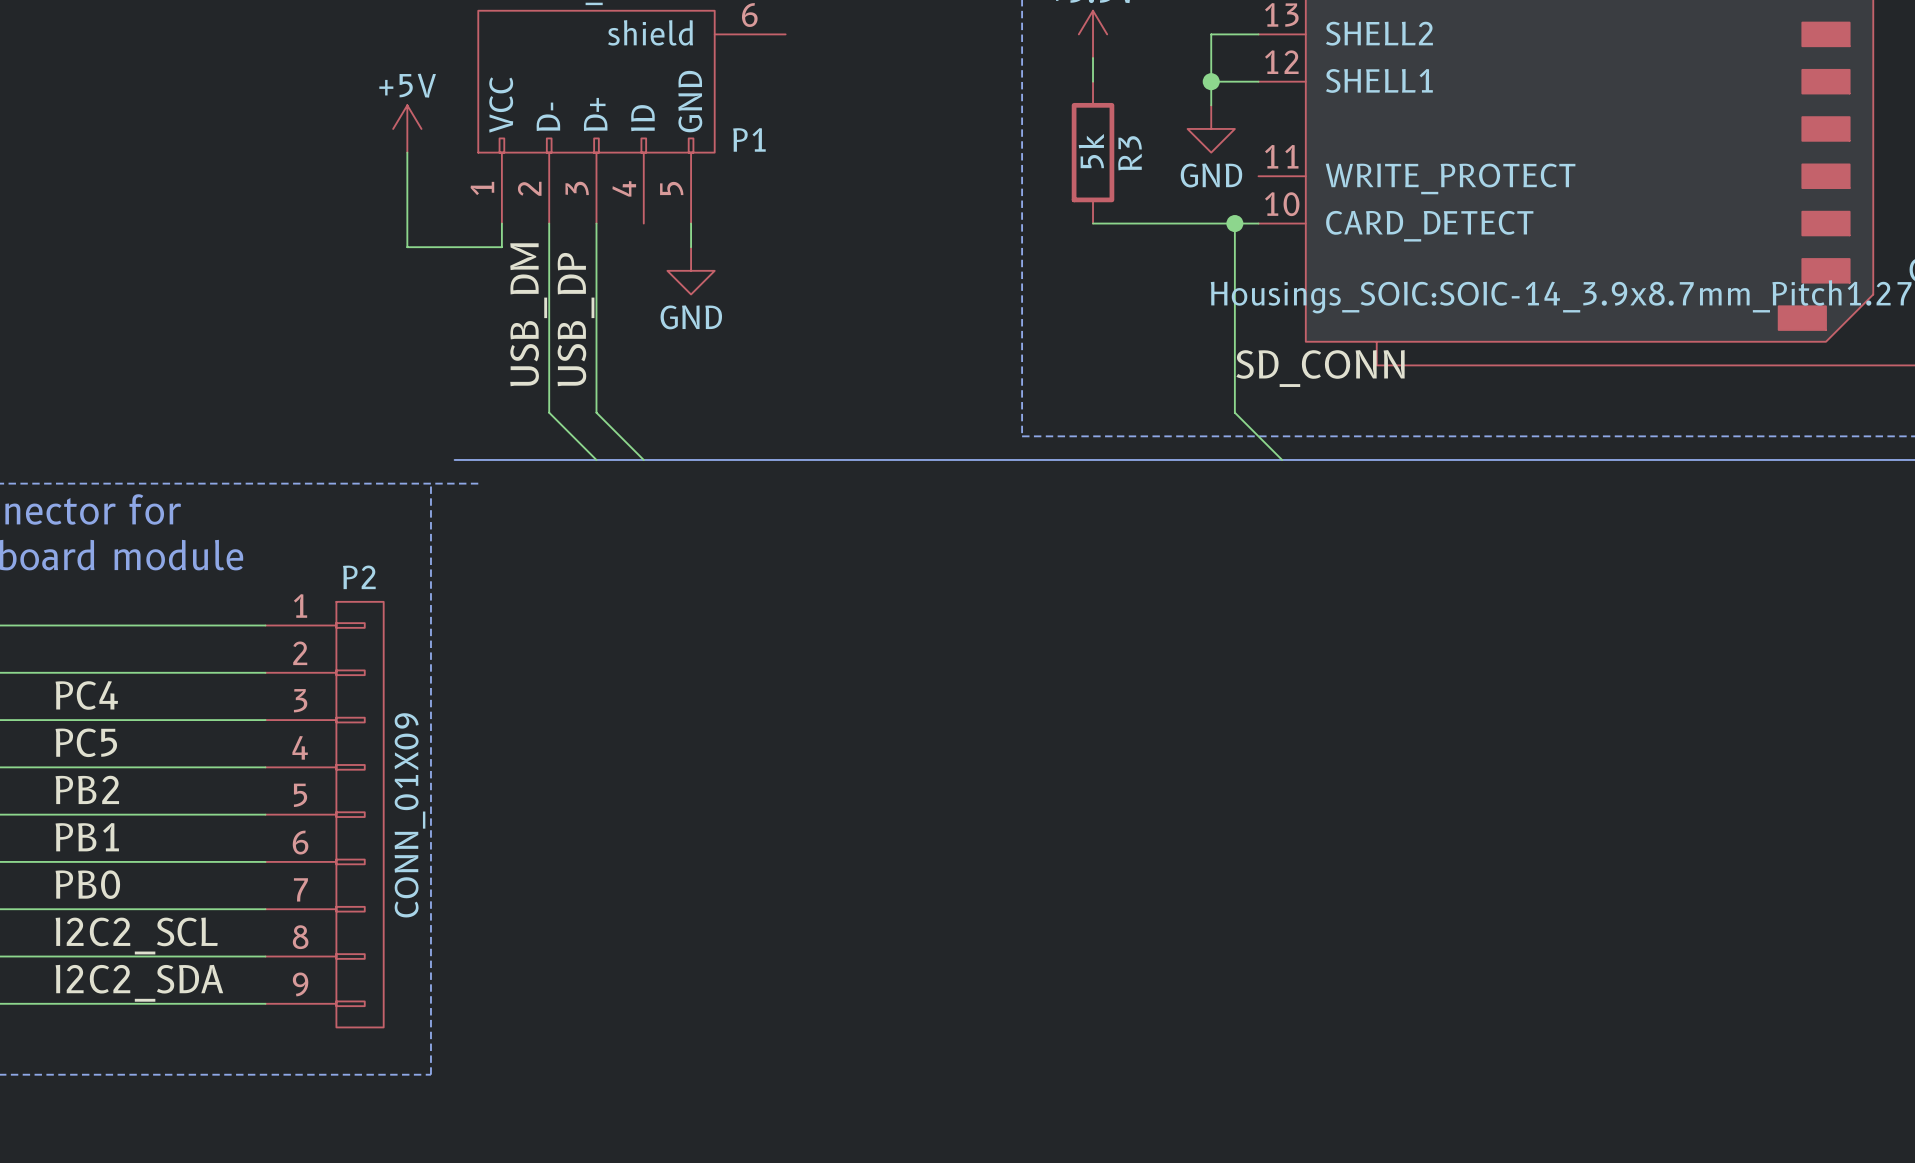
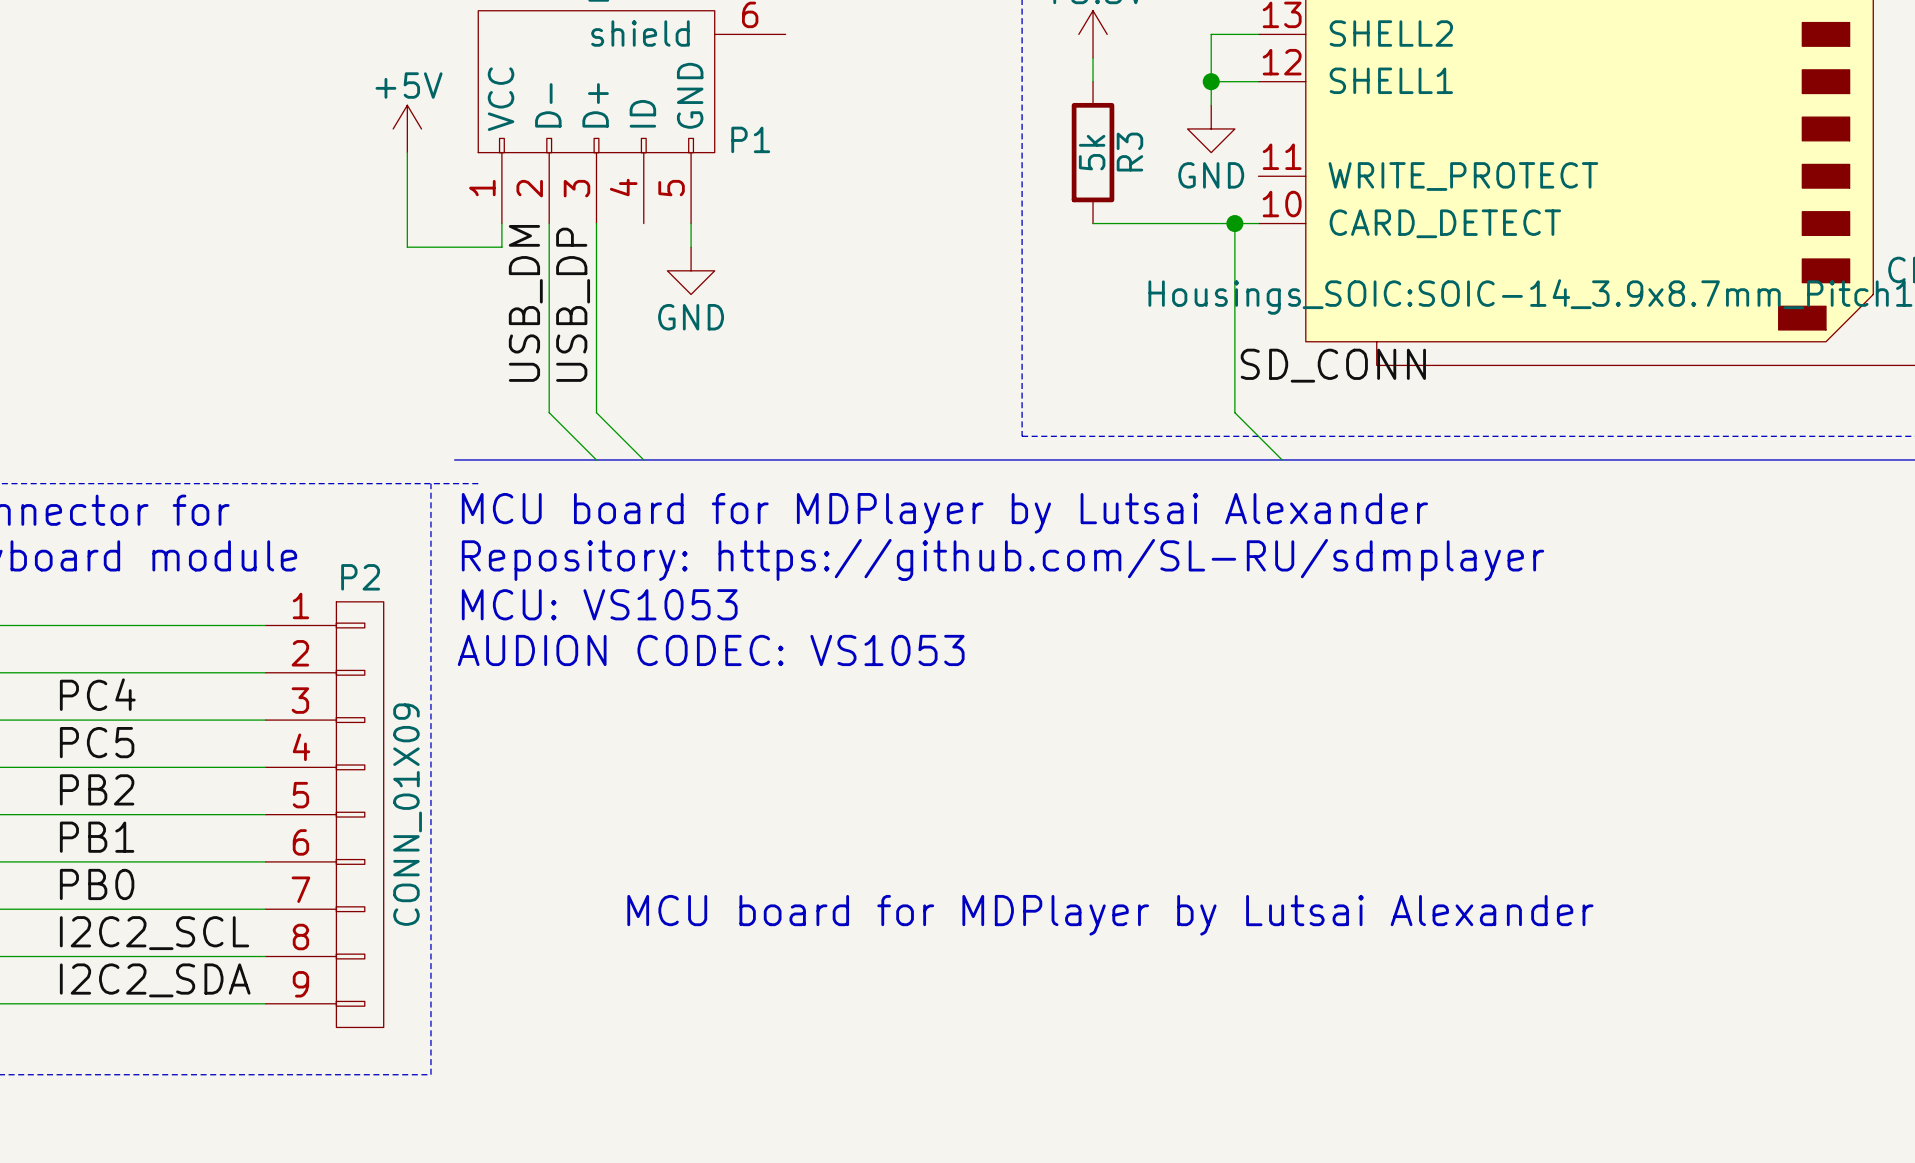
text: none -> MCU board for MDPlayer by Lutsai Alexander (944, 513)
text: none -> Repository: https://github.com/SL-RU/sdmplayer (1003, 559)
text: none -> MCU: VS1053 (599, 604)
text: none -> AUDION CODEC: VS1053 (711, 650)
text: none -> MCU board for MDPlayer by Lutsai Alexander (1110, 915)

